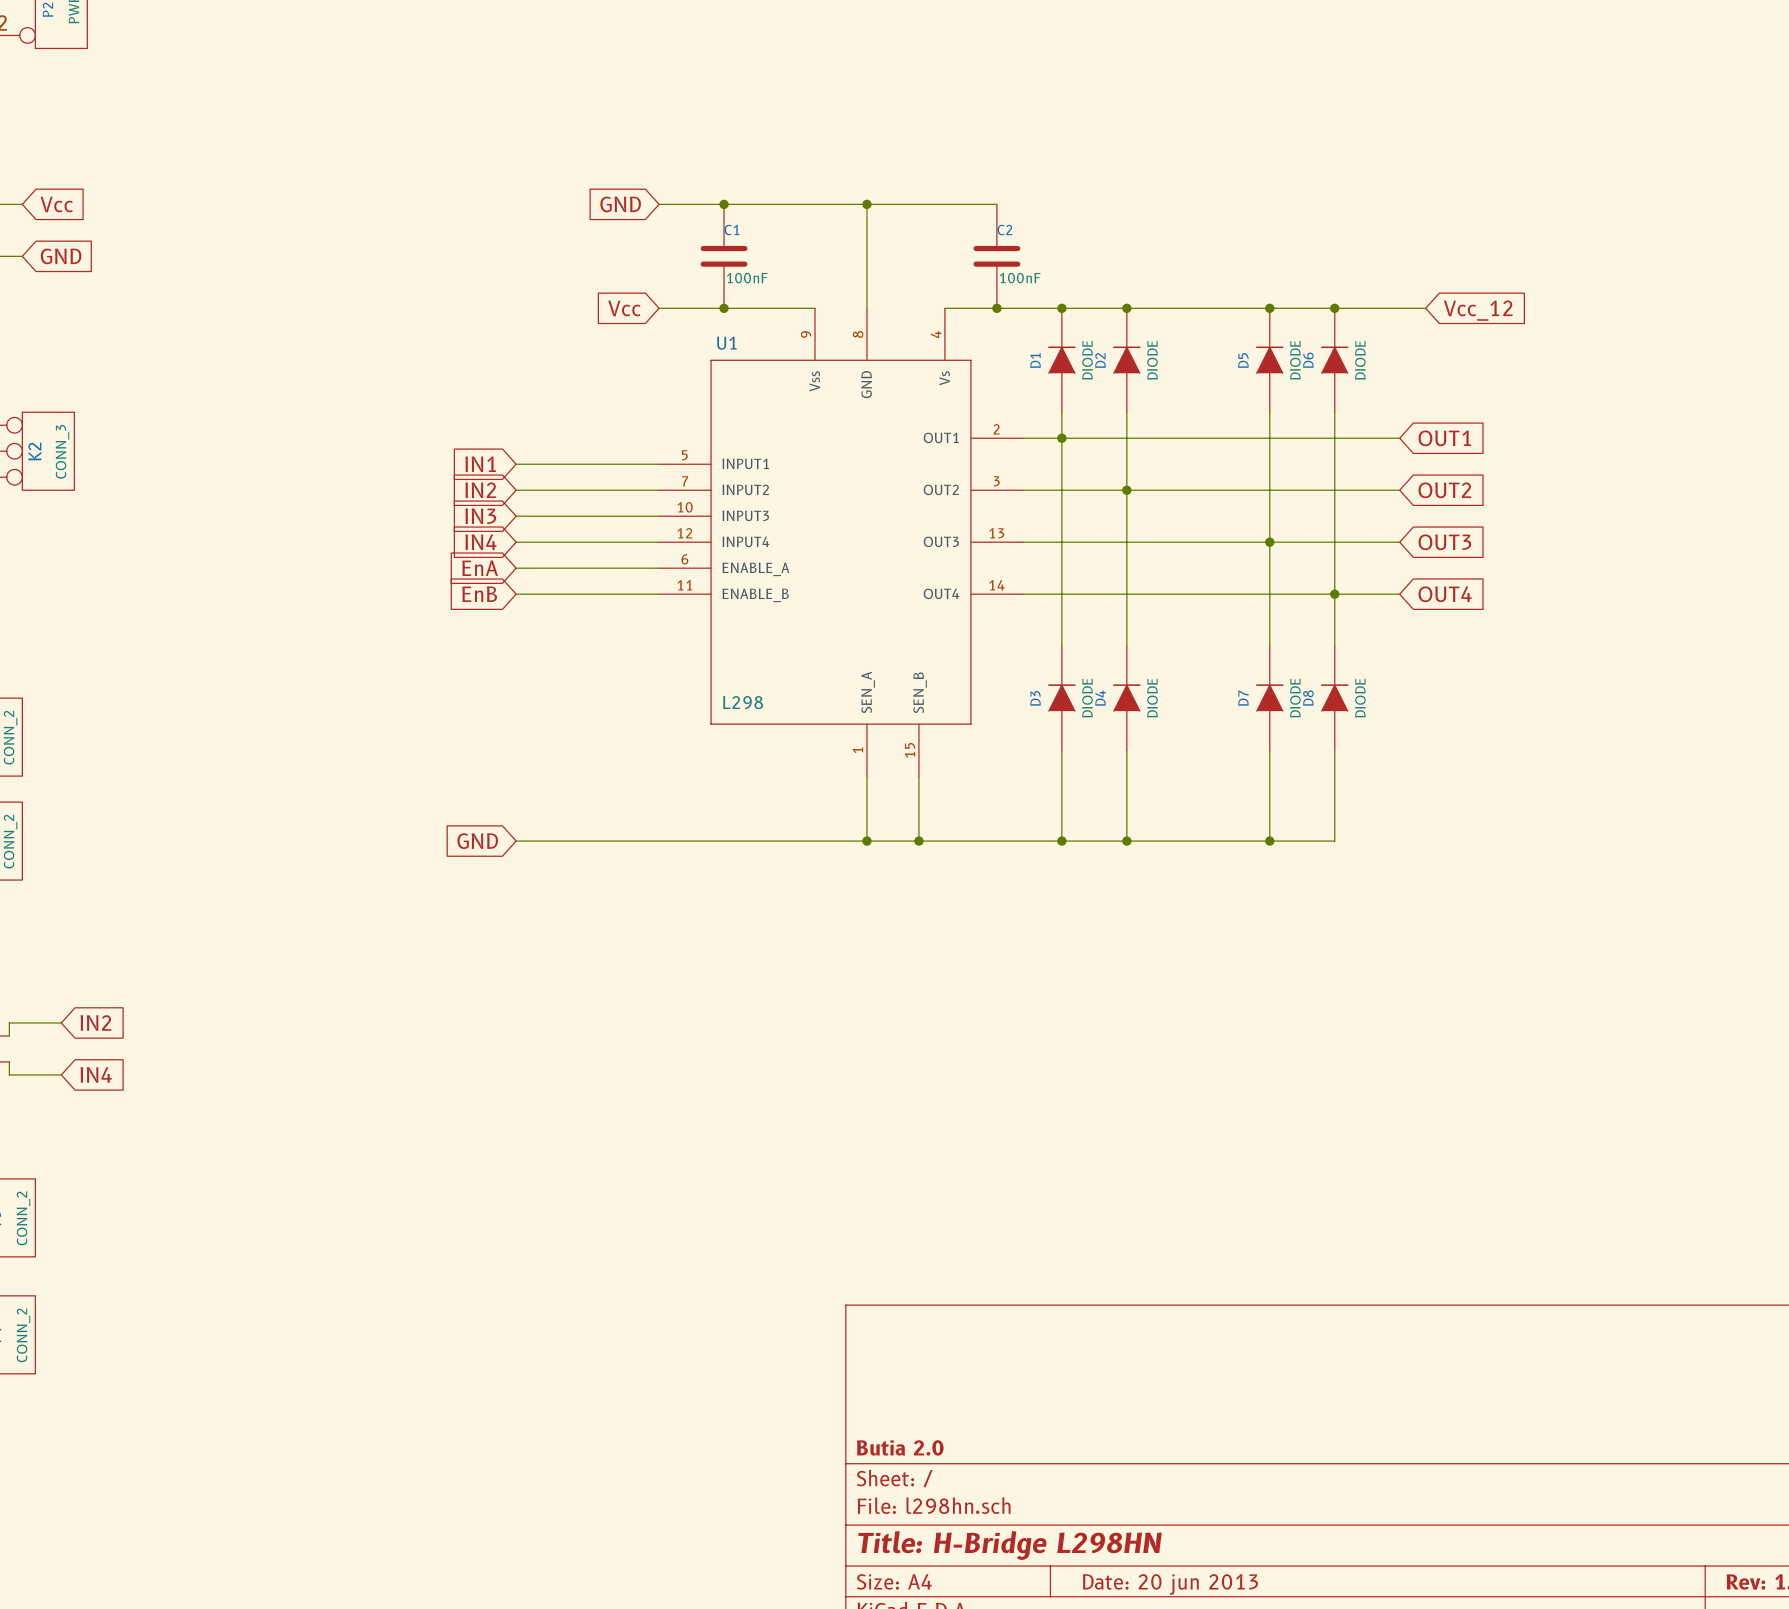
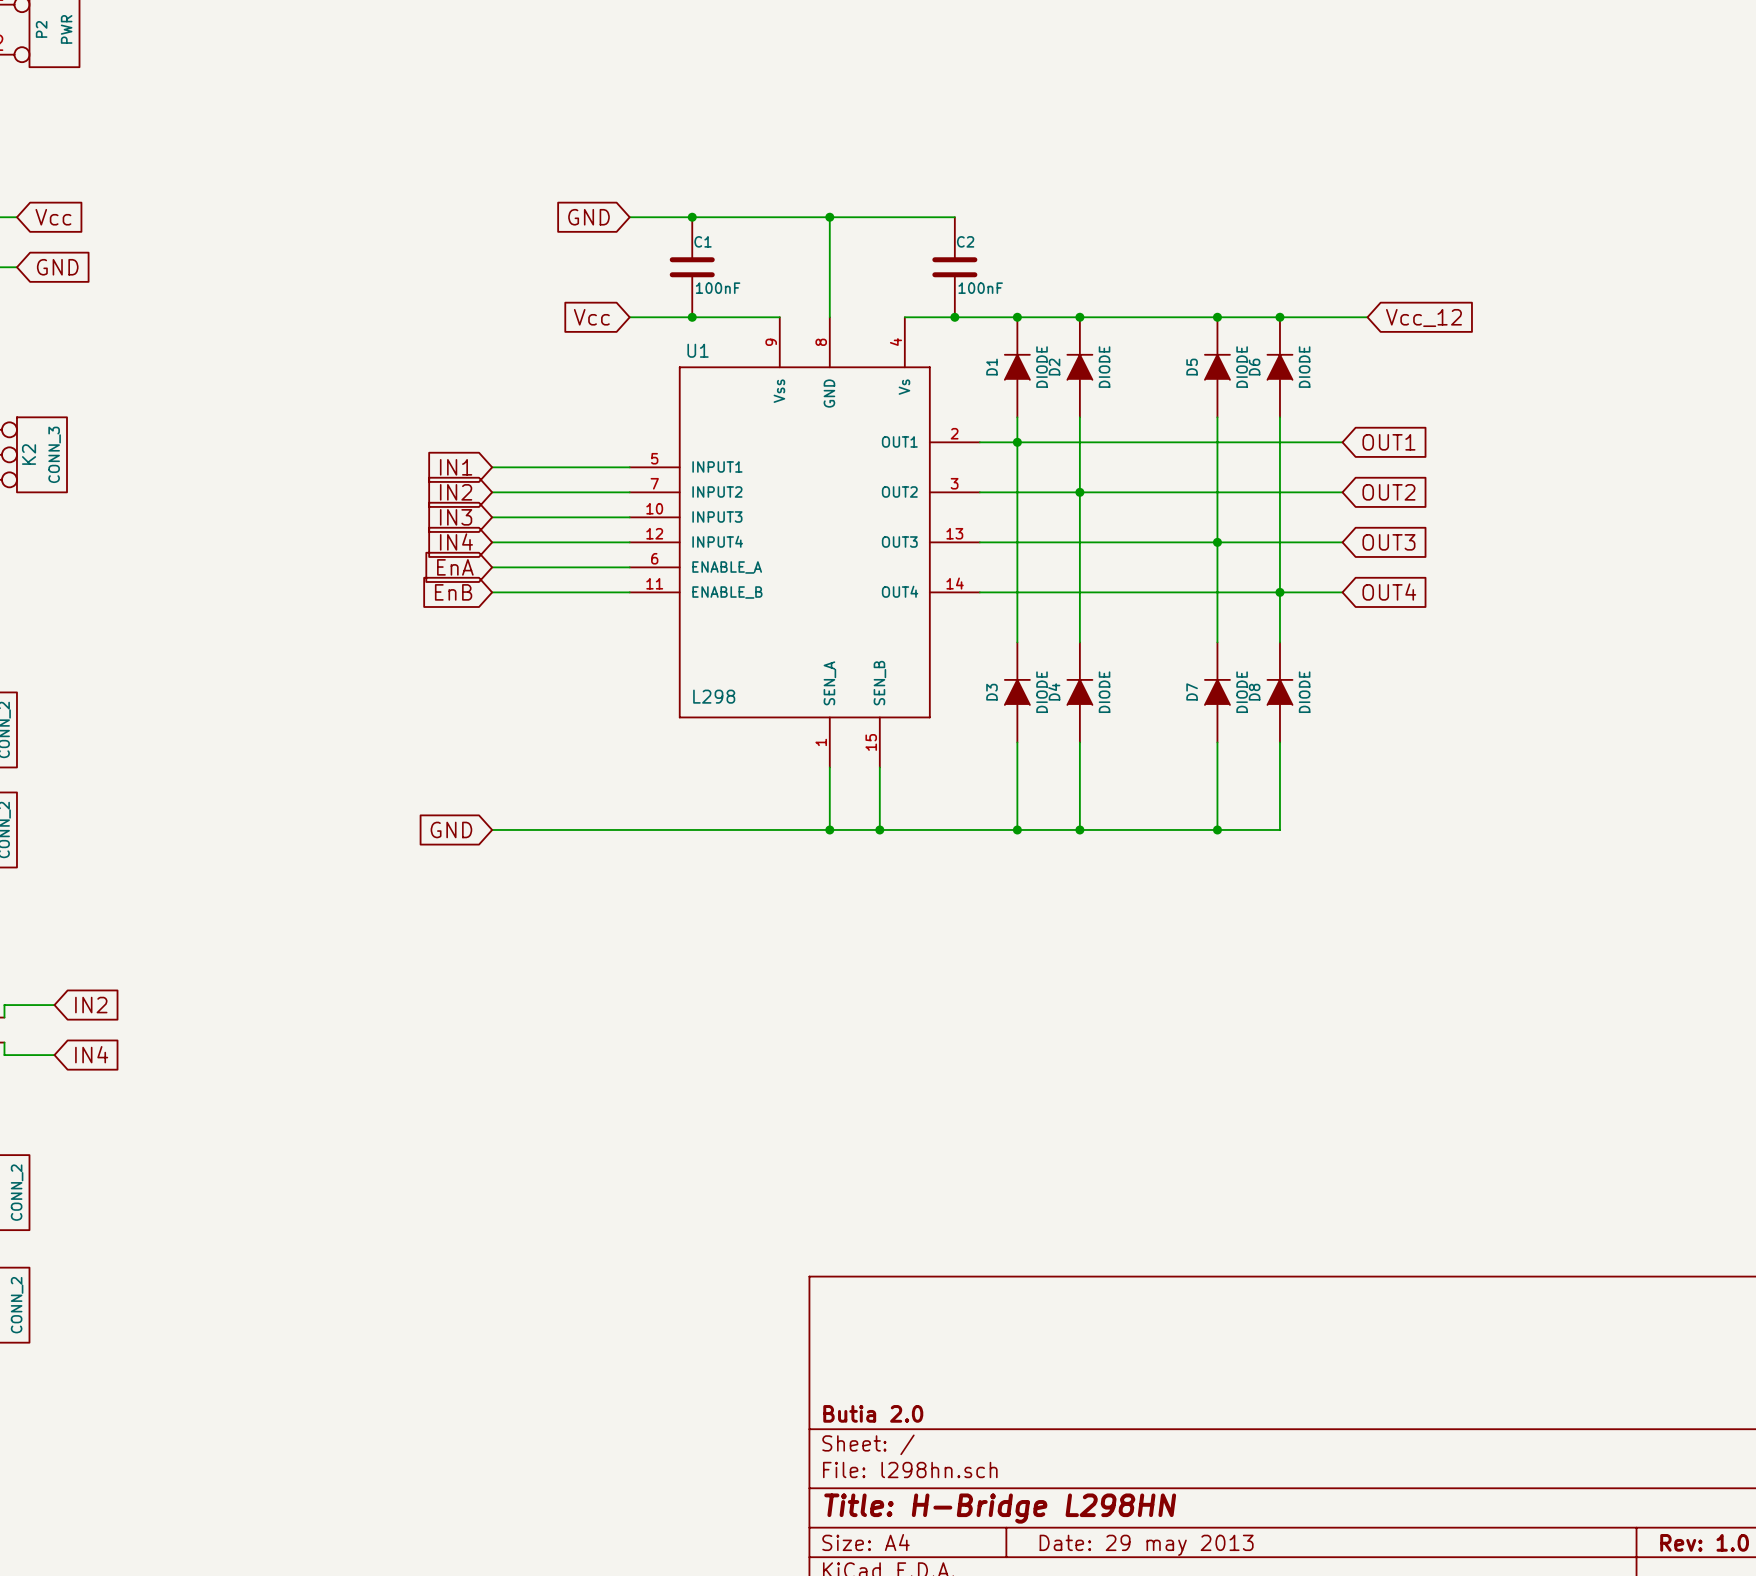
title block: Date: 20 jun 2013 (1170, 1584) -> Date: 29 may 2013 (1146, 1545)

